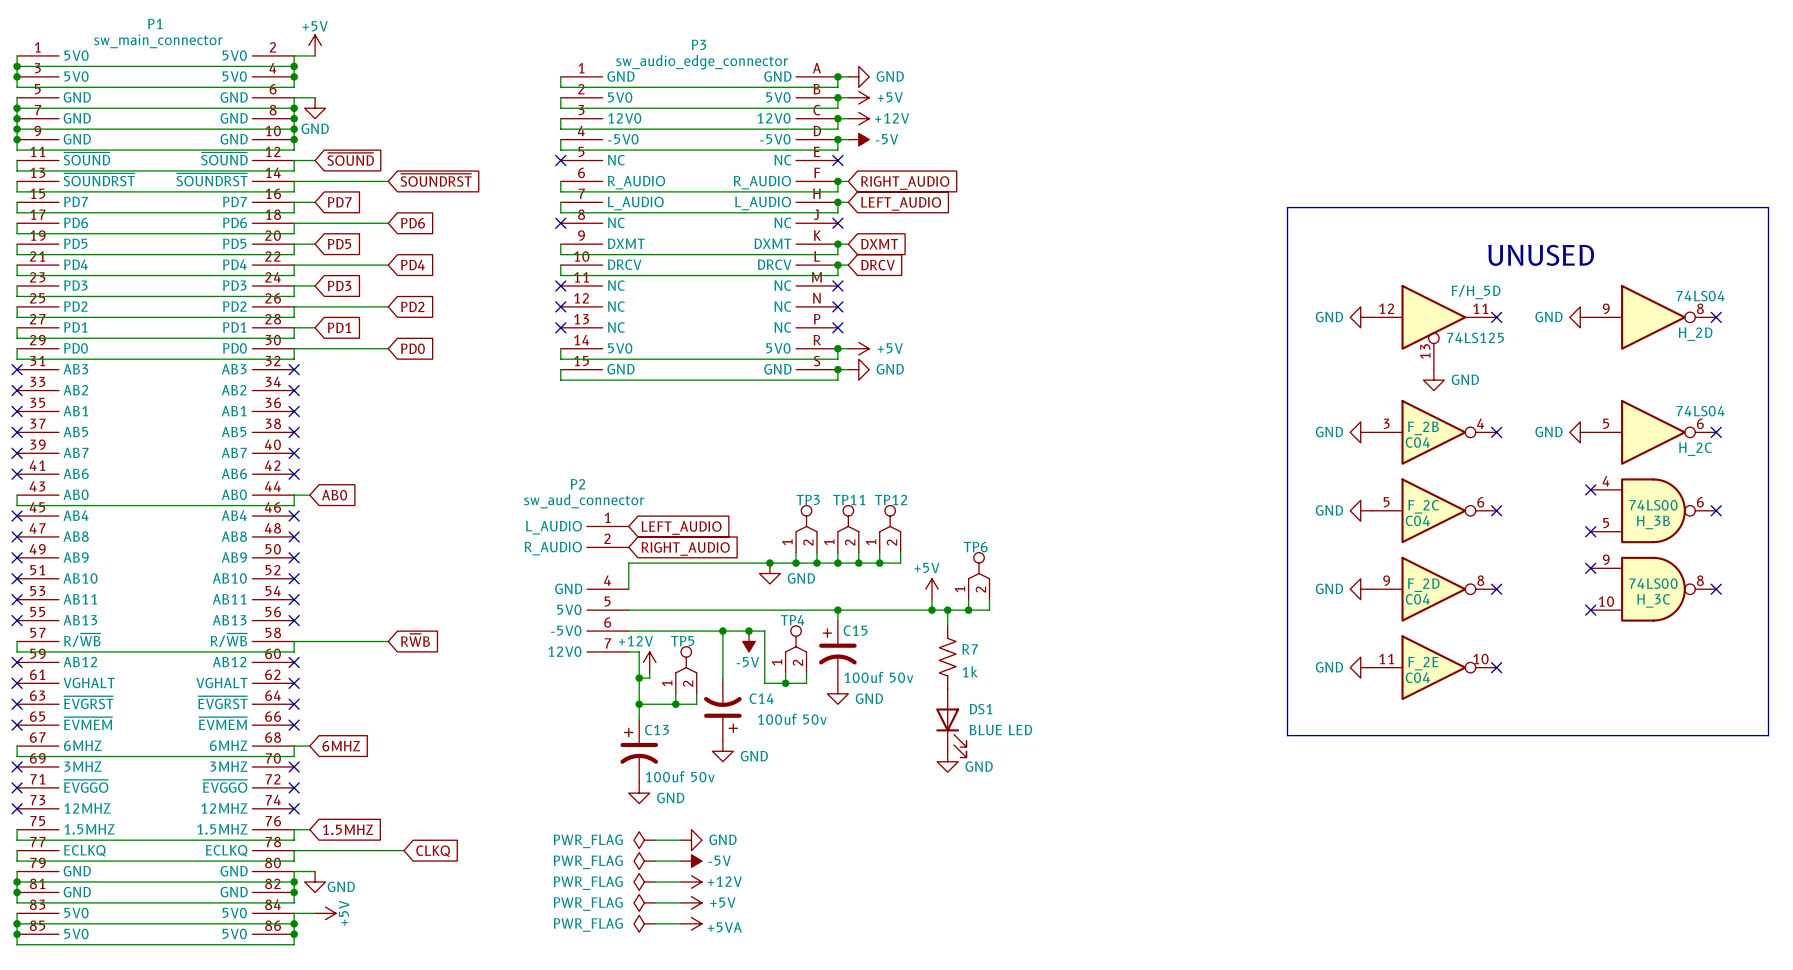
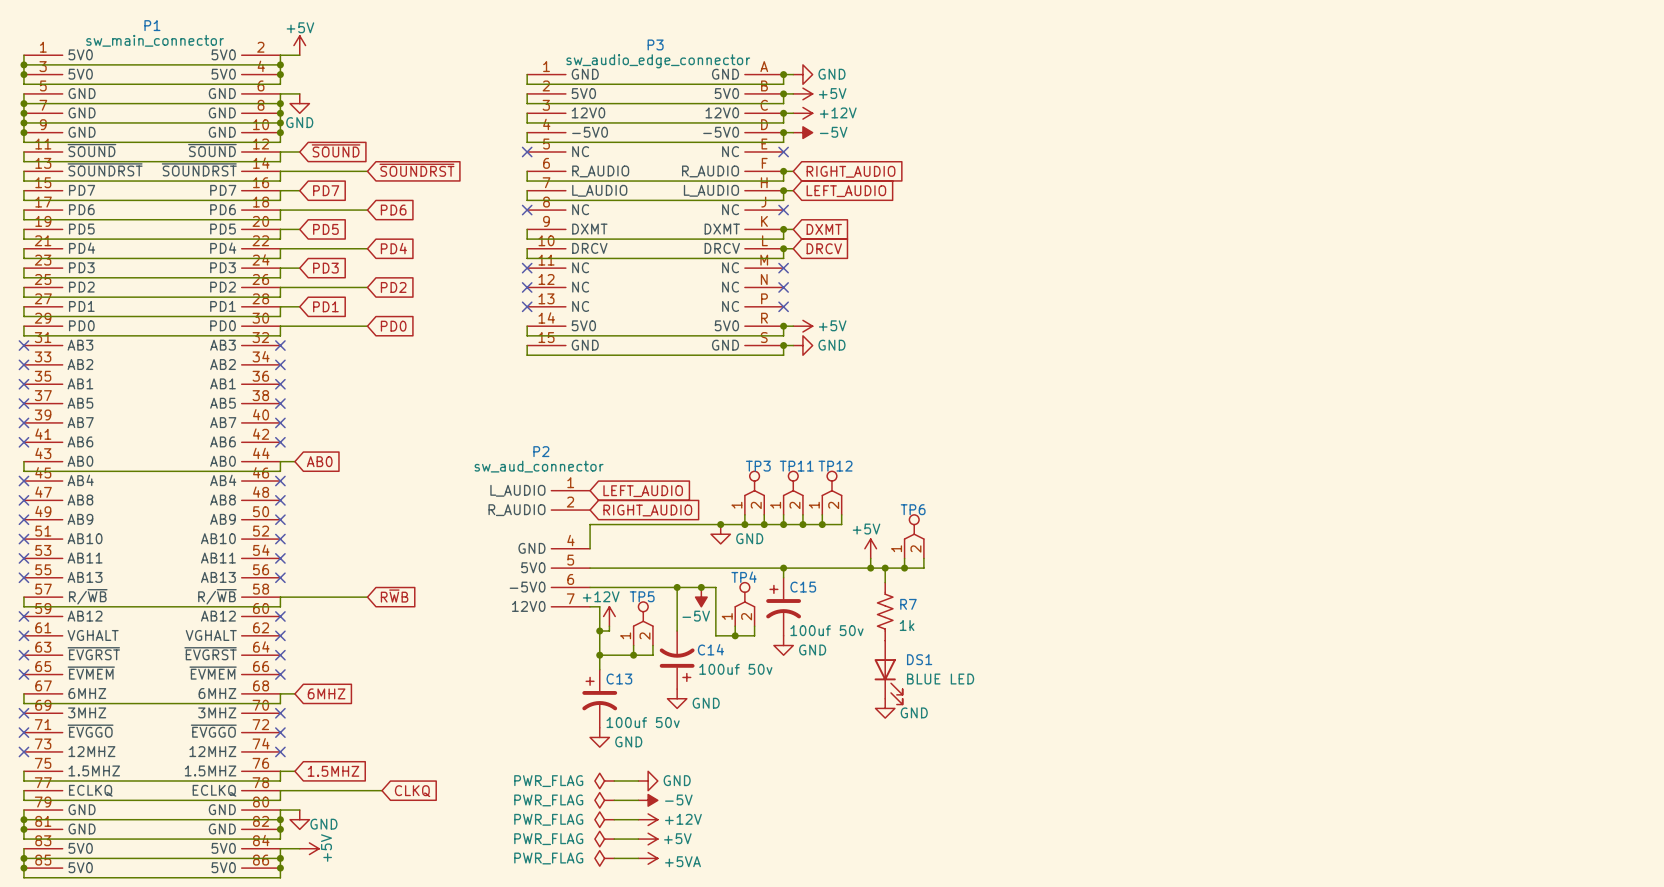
line: (1287, 207) (1287, 735) (1768, 735) (1768, 207) (1287, 207) -> none
text: UNUSED (1541, 255) -> none
power symbol: GND (1360, 317) -> none
no-connect mark: (1496, 317) -> none
power symbol: GND (1580, 317) -> none
H_2D: 74LS04 (1653, 317) -> none
no-connect mark: (1716, 317) -> none
F/H_5D: 74LS125 (1433, 327) -> none
power symbol: GND (1433, 380) -> none
power symbol: GND (1360, 432) -> none
F_2B: C04 (1433, 432) -> none
no-connect mark: (1496, 432) -> none
power symbol: GND (1580, 432) -> none
H_2C: 74LS04 (1653, 432) -> none
no-connect mark: (1716, 432) -> none
no-connect mark: (1590, 489) -> none
power symbol: GND (1360, 510) -> none
F_2C: C04 (1433, 510) -> none
no-connect mark: (1496, 510) -> none
H_3B: 74LS00 (1653, 510) -> none
no-connect mark: (1716, 510) -> none
no-connect mark: (1590, 531) -> none
no-connect mark: (1590, 568) -> none
power symbol: GND (1360, 589) -> none
F_2D: C04 (1433, 589) -> none
no-connect mark: (1496, 589) -> none
H_3C: 74LS00 (1653, 589) -> none
no-connect mark: (1716, 589) -> none
no-connect mark: (1590, 610) -> none
power symbol: GND (1360, 667) -> none
F_2E: C04 (1433, 667) -> none
no-connect mark: (1496, 667) -> none

